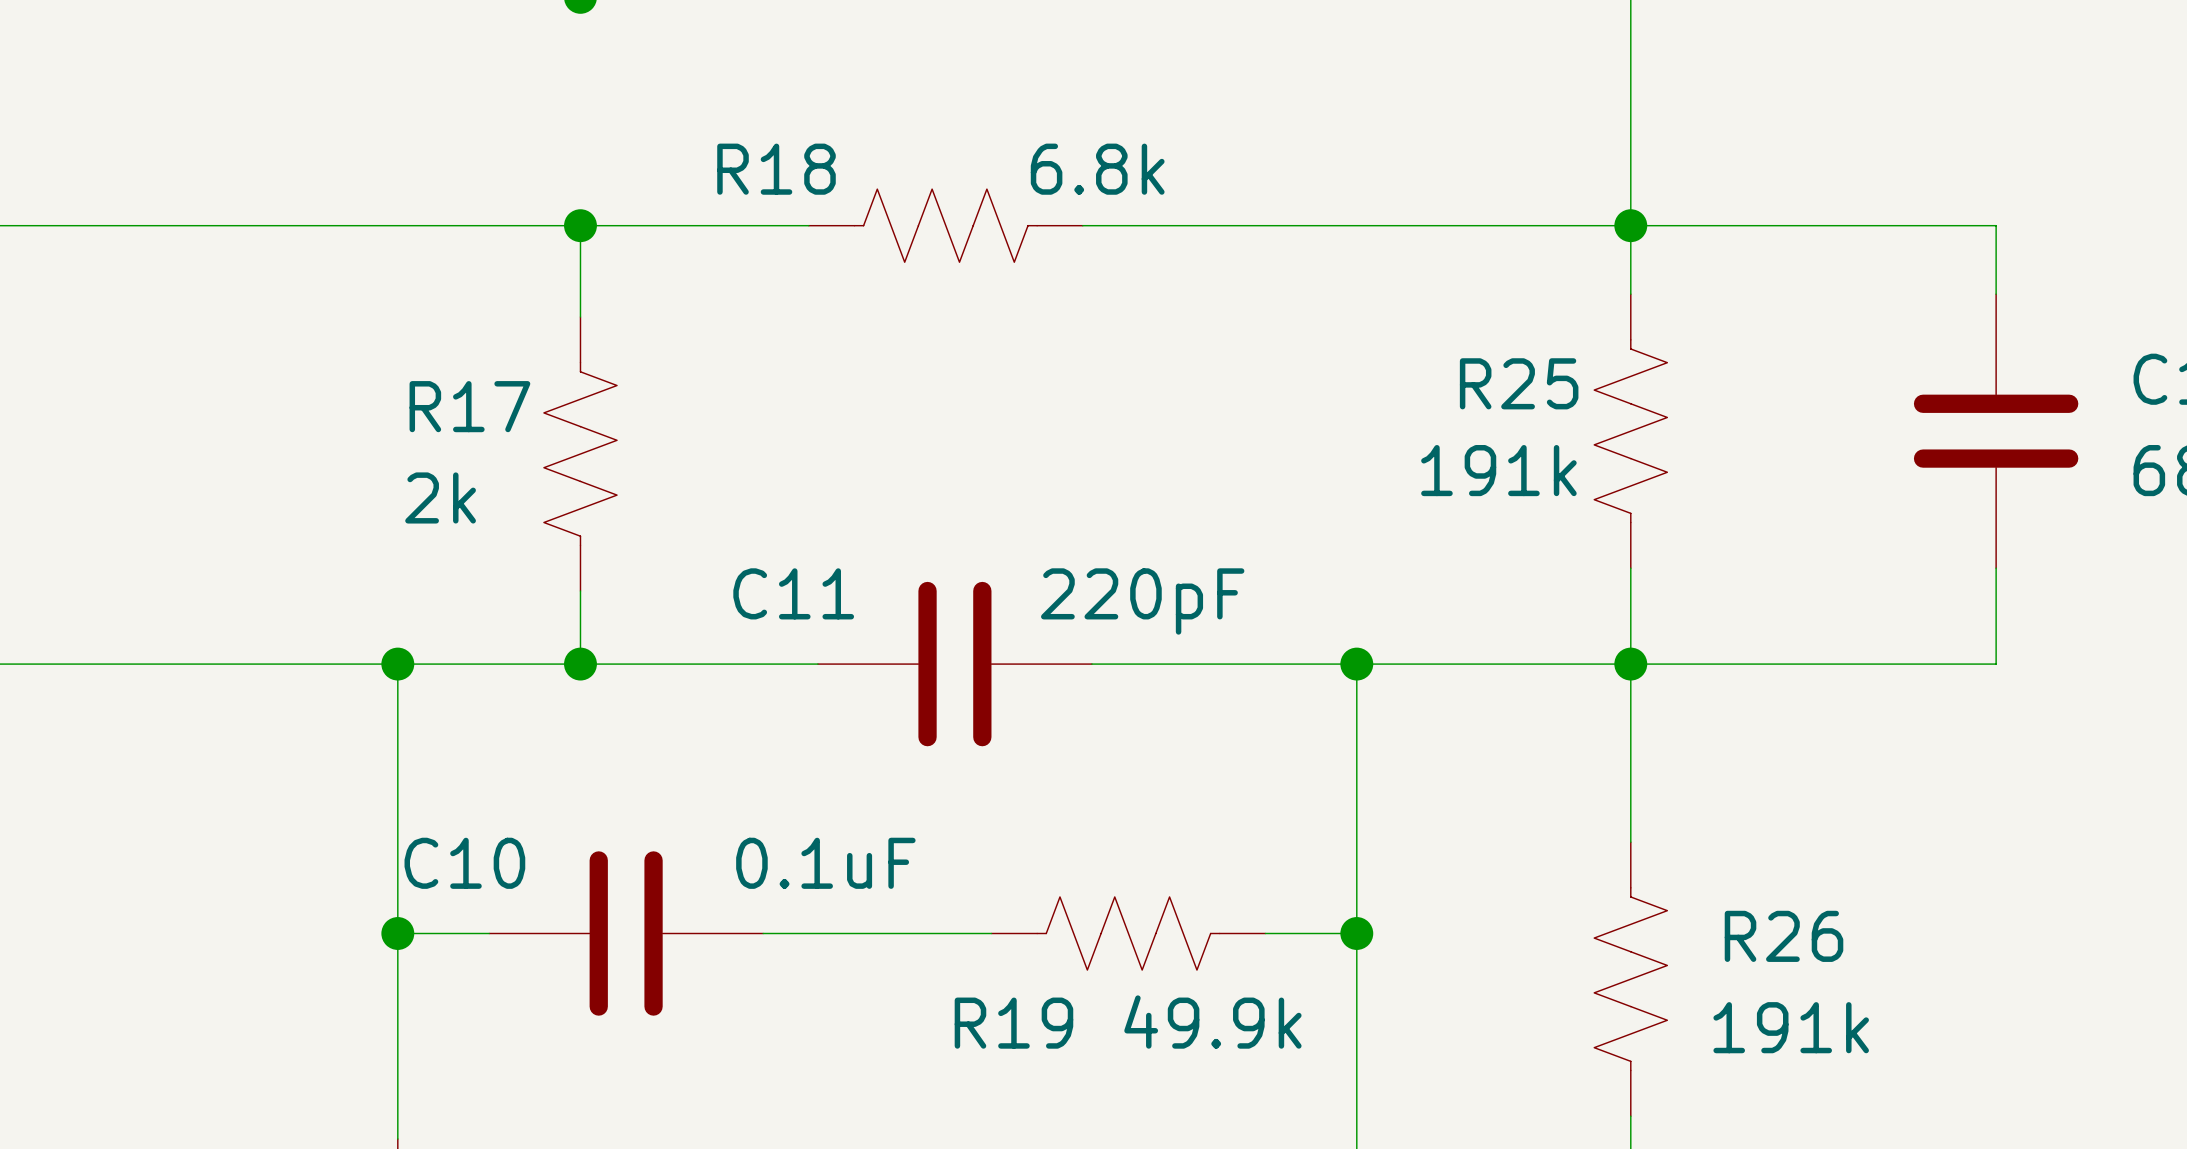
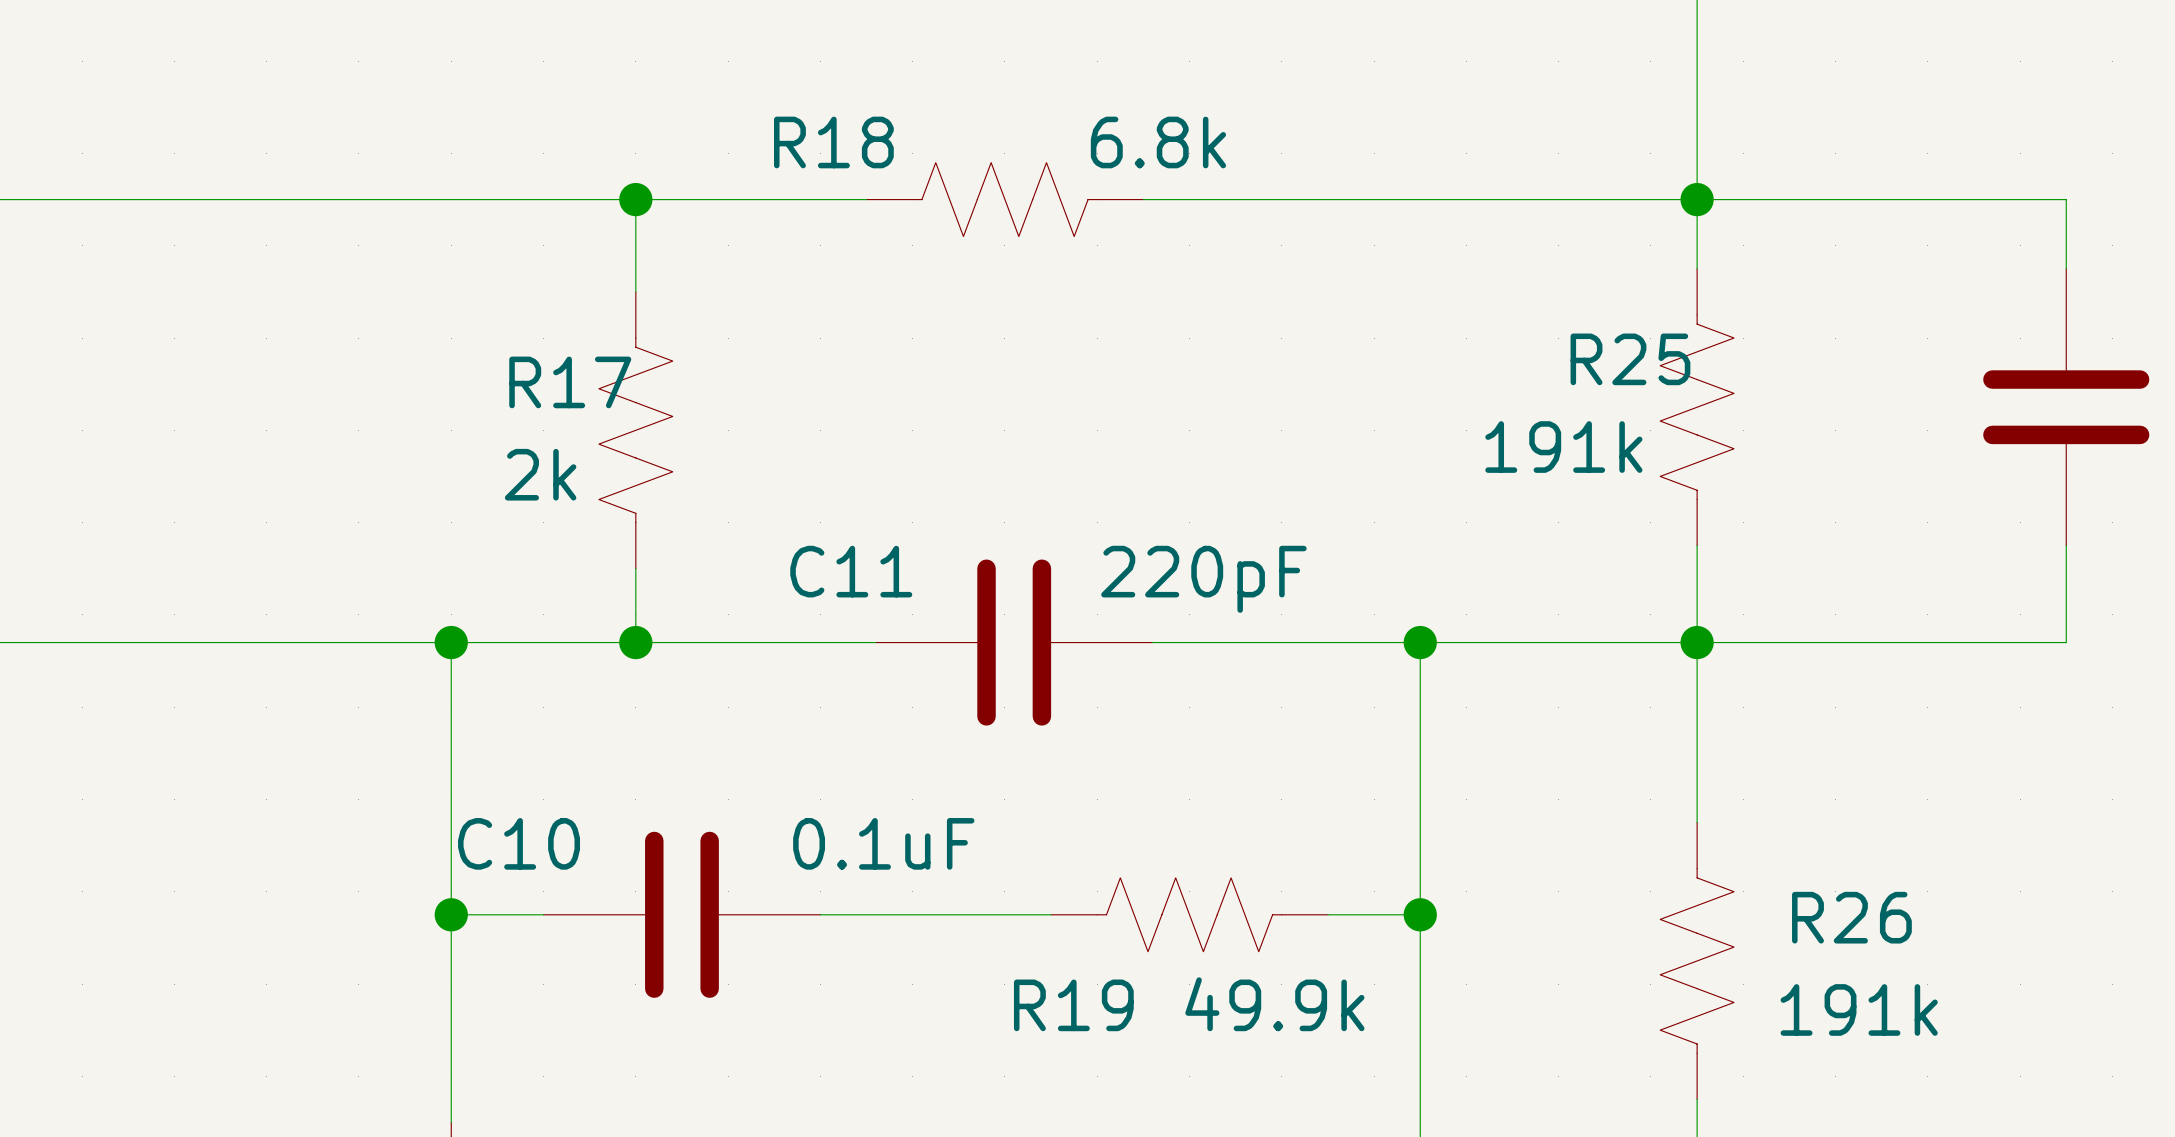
R25 name position: R25 (1519, 383) -> R25 (1630, 359)
R17 name position: R17 (469, 406) -> R17 (570, 382)
R17 value position: 2k (440, 497) -> 2k (540, 474)

